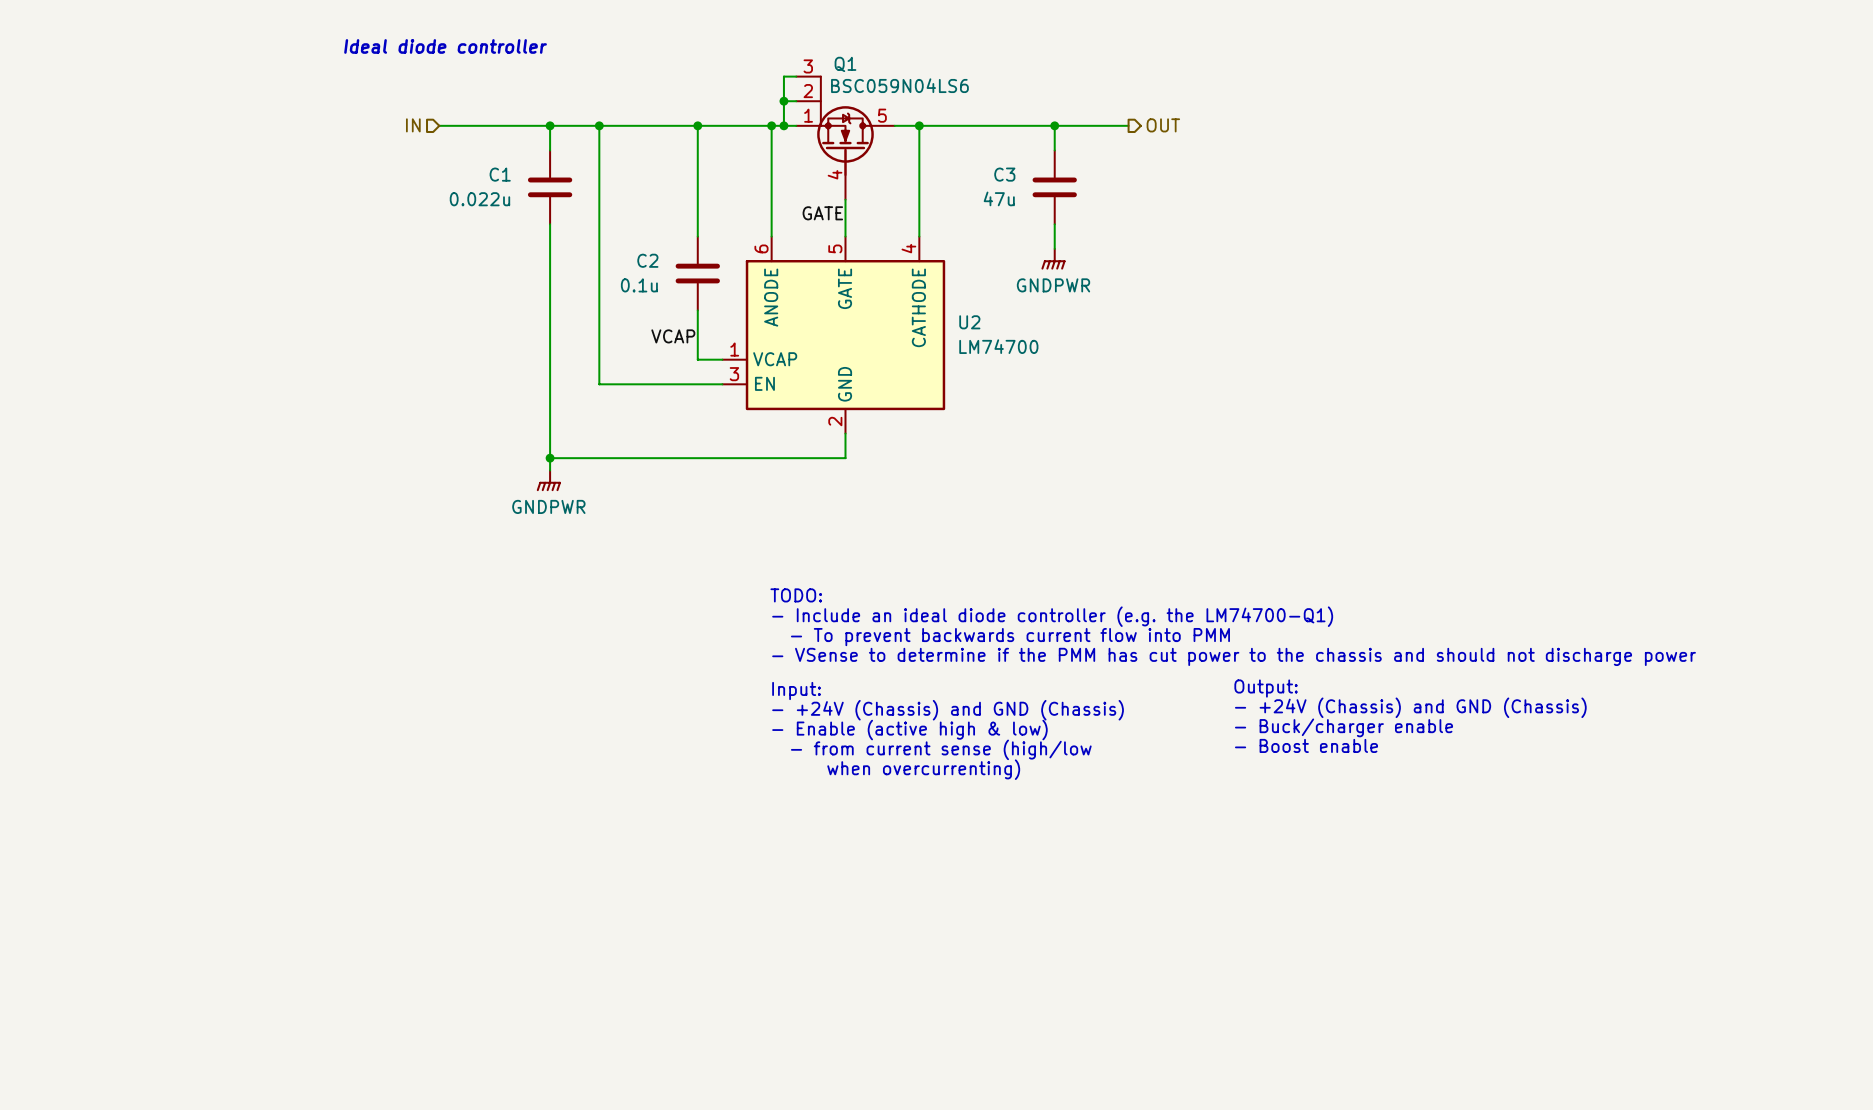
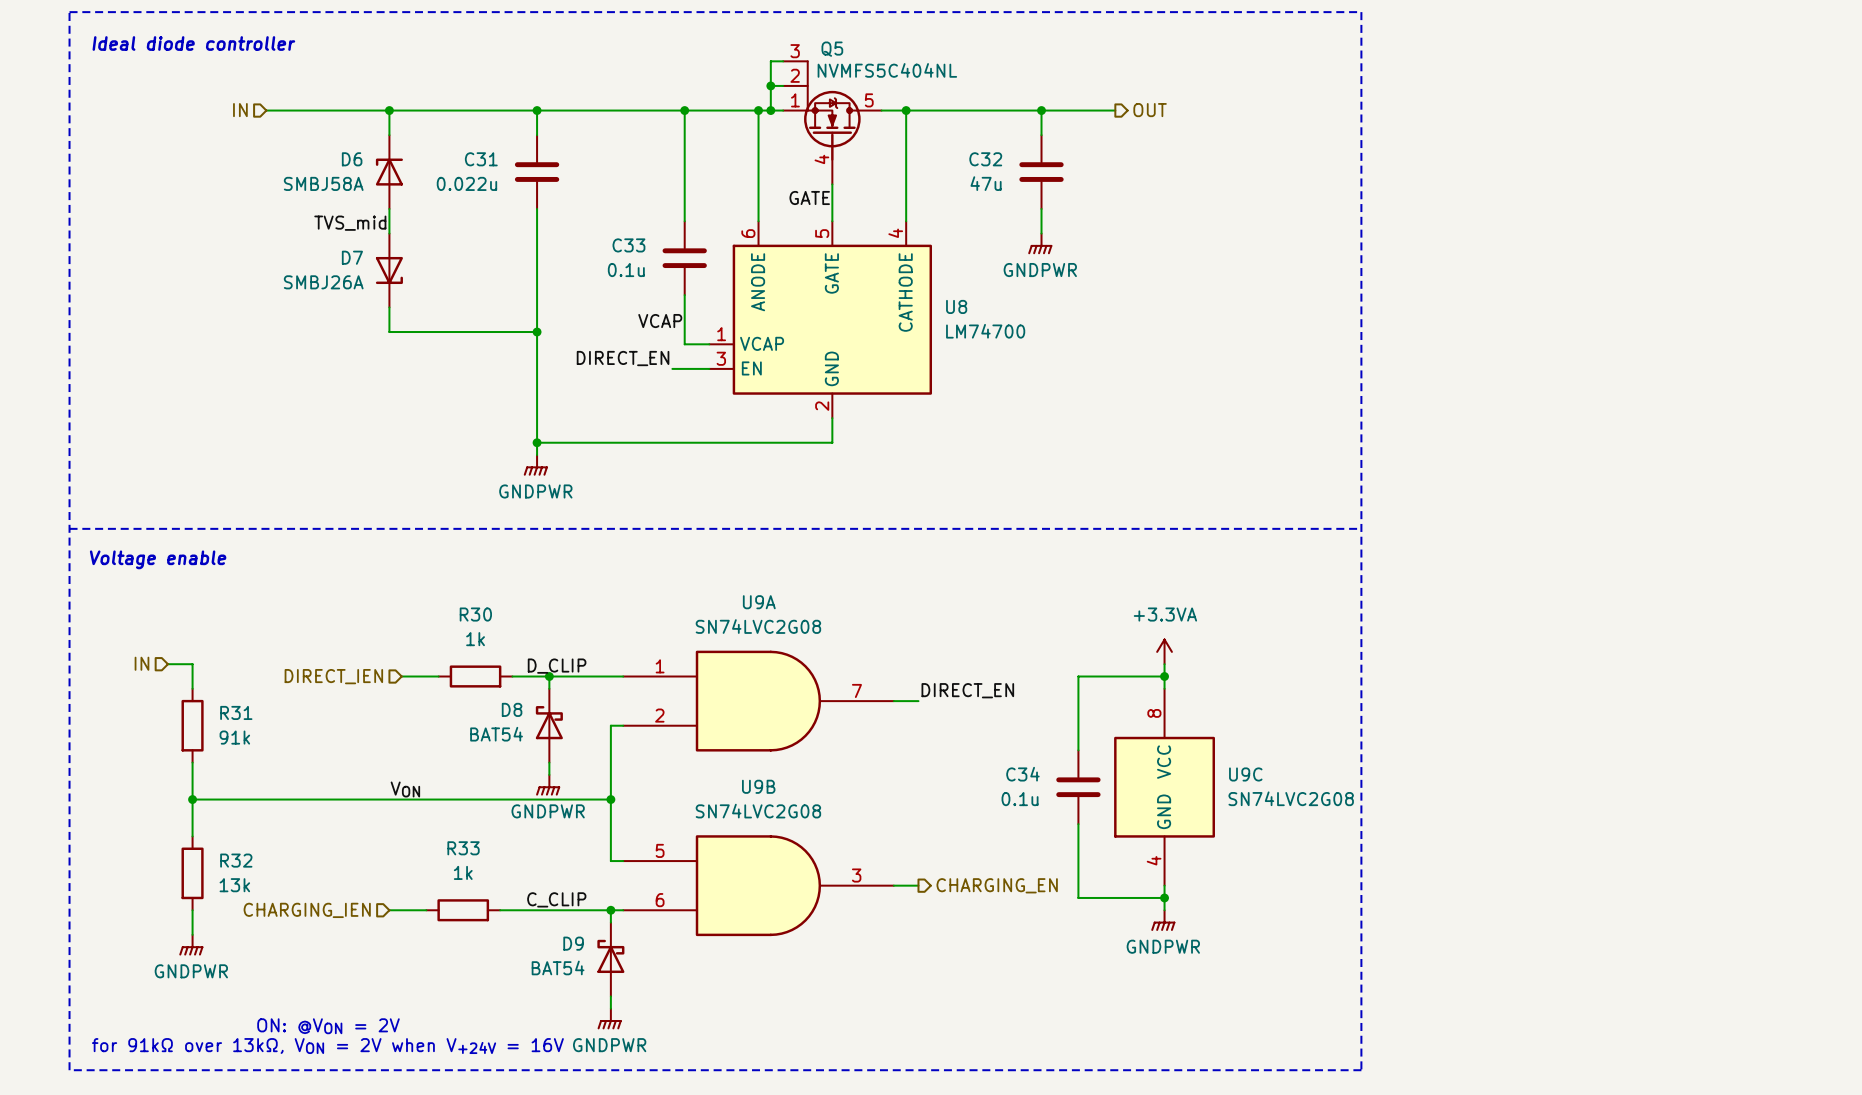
line: none -> (69, 12) (1361, 12) (1361, 1070) (69, 1070) (69, 12)
text position: Ideal diode controller (445, 46) -> Ideal diode controller (193, 43)
Q1 name: Q1 (845, 64) -> Q5 (832, 49)
Q1 value: BSC059N04LS6 (899, 85) -> NVMFS5C404NL (887, 70)
wire: none -> (266, 110) (426, 110)
wire: none -> (389, 110) (389, 135)
junction: none -> (389, 110)
hierarchical label position: IN (413, 125) -> IN (240, 110)
wire: (599, 125) (599, 384) (685, 384) -> none
junction: (599, 125) -> none
C1 name: C1 (500, 174) -> C31 (481, 159)
C3 name: C3 (1004, 174) -> C32 (985, 159)
D6: none -> SMBJ58A (389, 172)
wire: none -> (389, 208) (389, 233)
label: none -> TVS_mid (350, 223)
C2 name: C2 (647, 260) -> C33 (628, 245)
D7: none -> SMBJ26A (389, 270)
wire: none -> (389, 307) (389, 332) (537, 332)
U2 name: U2 (969, 322) -> U8 (956, 306)
junction: none -> (537, 332)
label: none -> DIRECT_EN (623, 358)
line: none -> (69, 528) (1361, 528)
text: none -> Voltage enable (158, 559)
text: TODO: (796, 595) -> none
text: - Include an ideal diode controller (e.g. the LM74700-Q1) (1052, 616) -> none
text: - To prevent backwards current flow into PMM (1010, 637) -> none
text: - VSense to determine if the PMM has cut power to the chassis and should not discharge power (1234, 656) -> none
power symbol: none -> +3.3VA (1164, 651)
hierarchical label: none -> IN (141, 663)
wire: none -> (167, 664) (192, 664) (192, 688)
wire: none -> (1164, 664) (1164, 688)
label: none -> D_CLIP (557, 666)
text: Output: (1266, 688) -> none
text: Input: (796, 691) -> none
hierarchical label: none -> DIRECT_IEN (333, 676)
wire: none -> (401, 676) (438, 676)
R30: none -> 1k (475, 676)
wire: none -> (512, 676) (623, 676)
wire: none -> (549, 676) (549, 688)
junction: none -> (549, 676)
wire: none -> (1164, 676) (1078, 676) (1078, 750)
junction: none -> (1164, 676)
label: none -> DIRECT_EN (967, 690)
text: - +24V (Chassis) and GND (Chassis) (1410, 707) -> none
text: - +24V (Chassis) and GND (Chassis) (948, 710) -> none
U9A: none -> SN74LVC2G08 (758, 701)
wire: none -> (893, 701) (918, 701)
text: - Buck/charger enable (1344, 727) -> none
text: - Enable (active high & low) (909, 730) -> none
R31: none -> 91k (192, 725)
D8: none -> BAT54 (549, 725)
wire: none -> (623, 725) (610, 725) (610, 861) (623, 861)
text: - Boost enable (1306, 745) -> none
text: - from current sense (high/low (941, 749) -> none
text: when overcurrenting) (923, 769) -> none
wire: none -> (192, 762) (192, 836)
wire: none -> (549, 762) (549, 774)
power symbol: none -> GNDPWR (548, 785)
C34: none -> 0.1u (1078, 787)
U9C: none -> SN74LVC2G08 (1164, 787)
label: none -> VON (405, 789)
wire: none -> (192, 799) (610, 799)
junction: none -> (192, 799)
junction: none -> (610, 799)
wire: none -> (1078, 824) (1078, 897) (1164, 897)
R32: none -> 13k (192, 873)
U9B: none -> SN74LVC2G08 (758, 885)
wire: none -> (893, 885) (918, 885)
hierarchical label: none -> CHARGING_EN (997, 885)
wire: none -> (1164, 885) (1164, 910)
junction: none -> (1164, 897)
label: none -> C_CLIP (556, 899)
wire: none -> (192, 910) (192, 934)
hierarchical label: none -> CHARGING_IEN (307, 910)
wire: none -> (389, 910) (426, 910)
R33: none -> 1k (463, 910)
wire: none -> (500, 910) (623, 910)
wire: none -> (610, 910) (610, 922)
junction: none -> (610, 910)
power symbol: none -> GNDPWR (1163, 920)
power symbol: none -> GNDPWR (191, 945)
D9: none -> BAT54 (610, 959)
wire: none -> (610, 996) (610, 1008)
power symbol: none -> GNDPWR (609, 1019)
text: none -> ON: @VON = 2V (328, 1026)
text: none -> for 91kΩ over 13kΩ, VON = 2V when V+24V = 16V (327, 1046)

